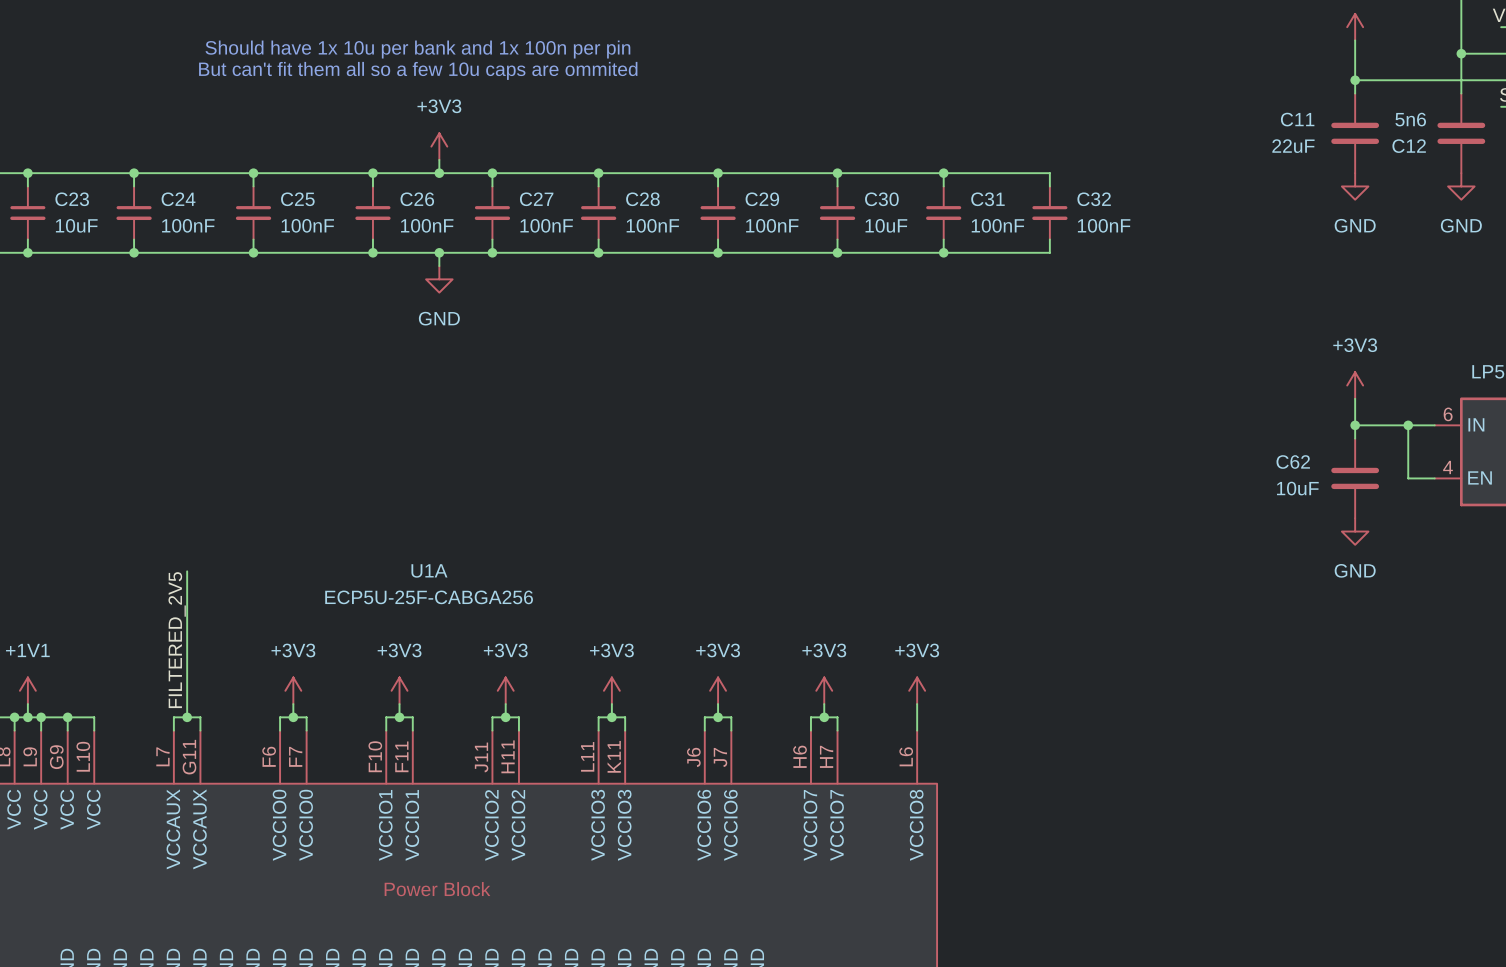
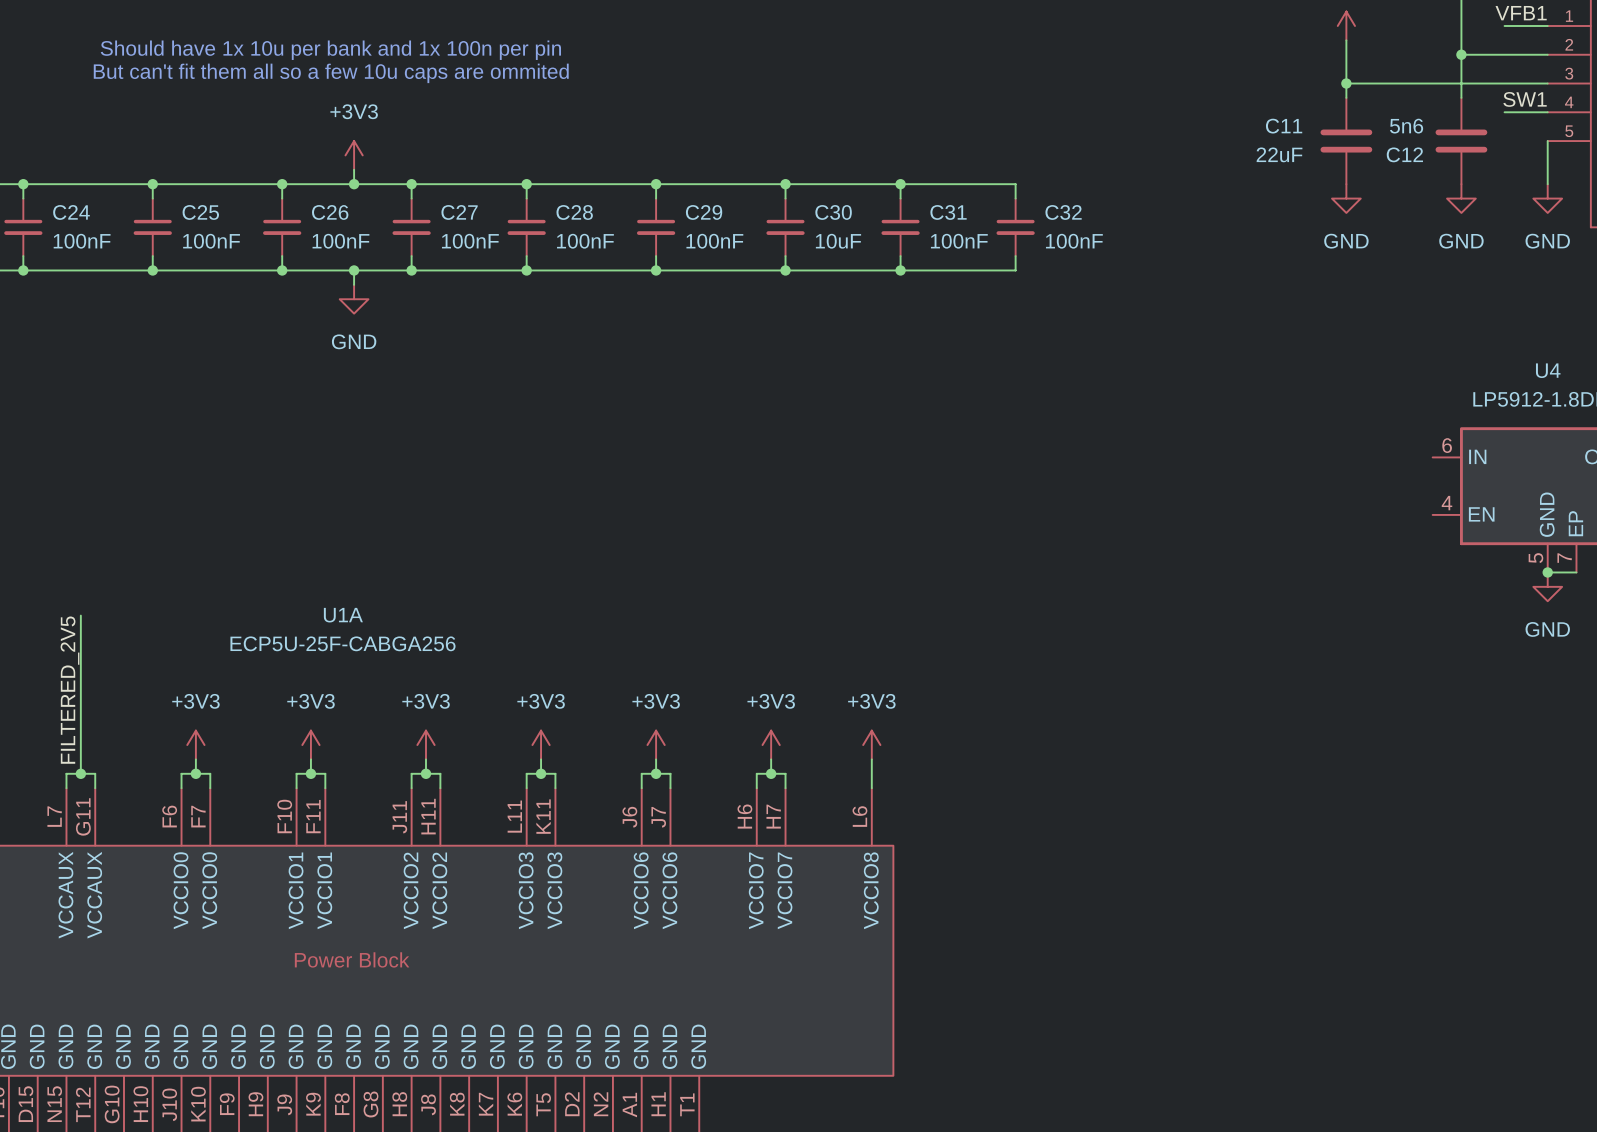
power symbol: +3V3 (1355, 385) -> none
wire: (1355, 398) (1355, 438) -> none
wire: (1355, 425) (1434, 425) -> none
junction: (1355, 425) -> none
wire: (1408, 425) (1408, 478) (1434, 478) -> none
junction: (1408, 425) -> none
C62: 10uF (1355, 478) -> none
power symbol: GND (1355, 531) -> none

